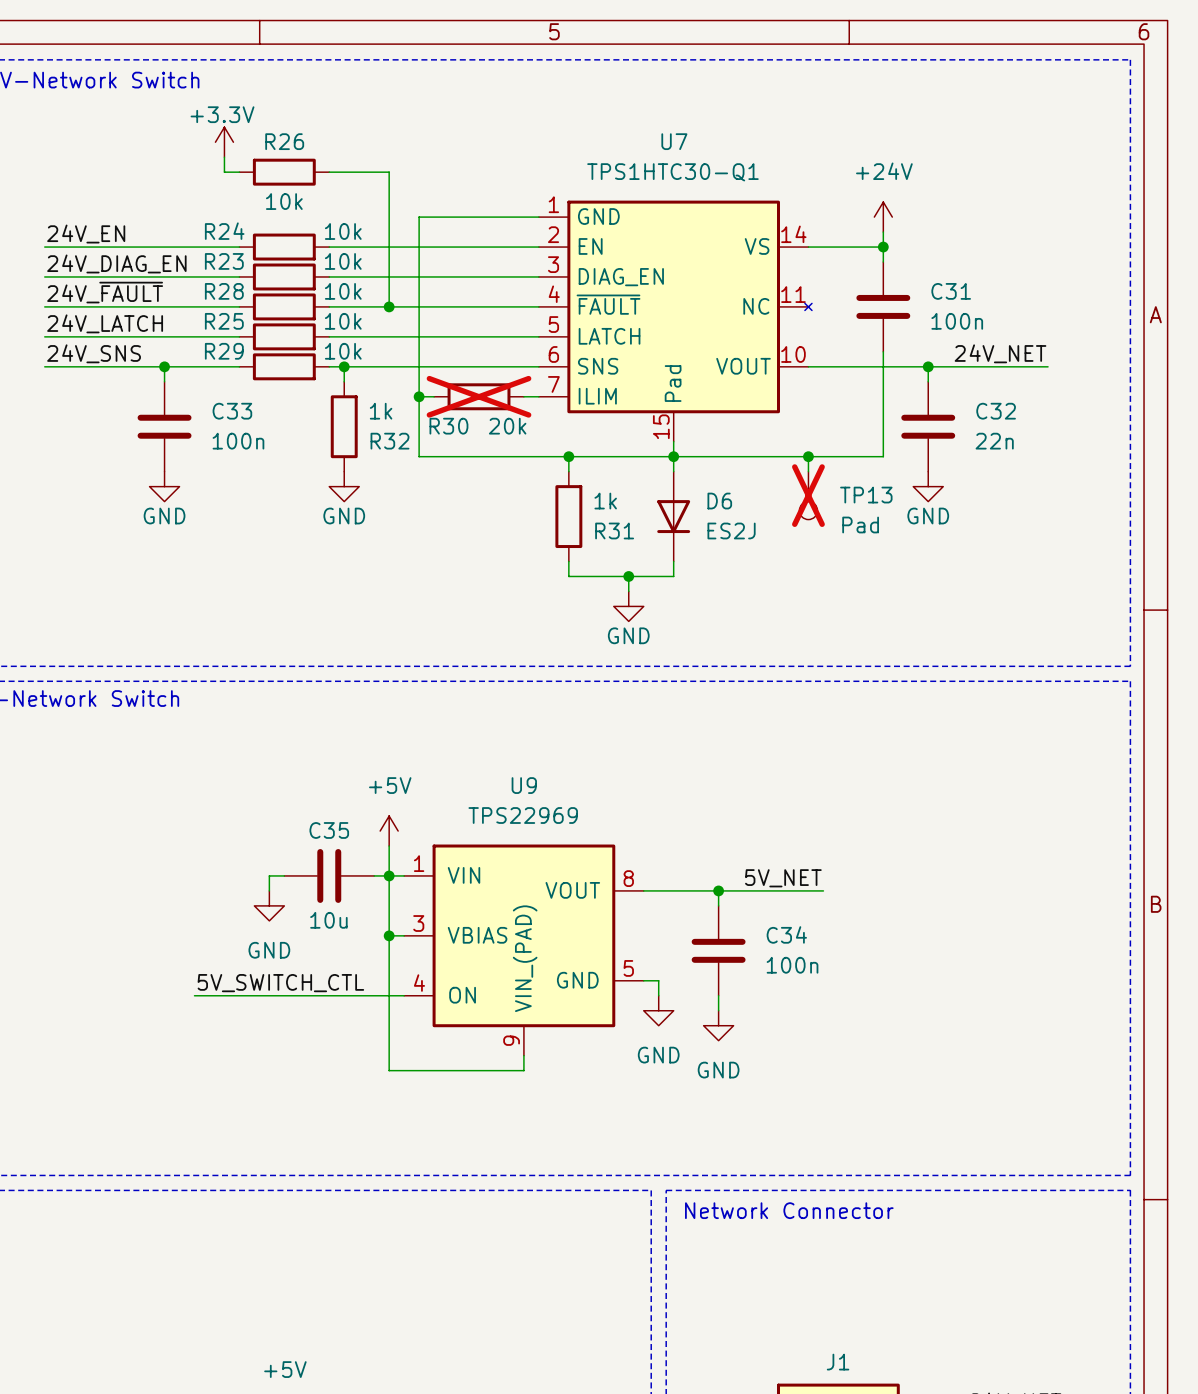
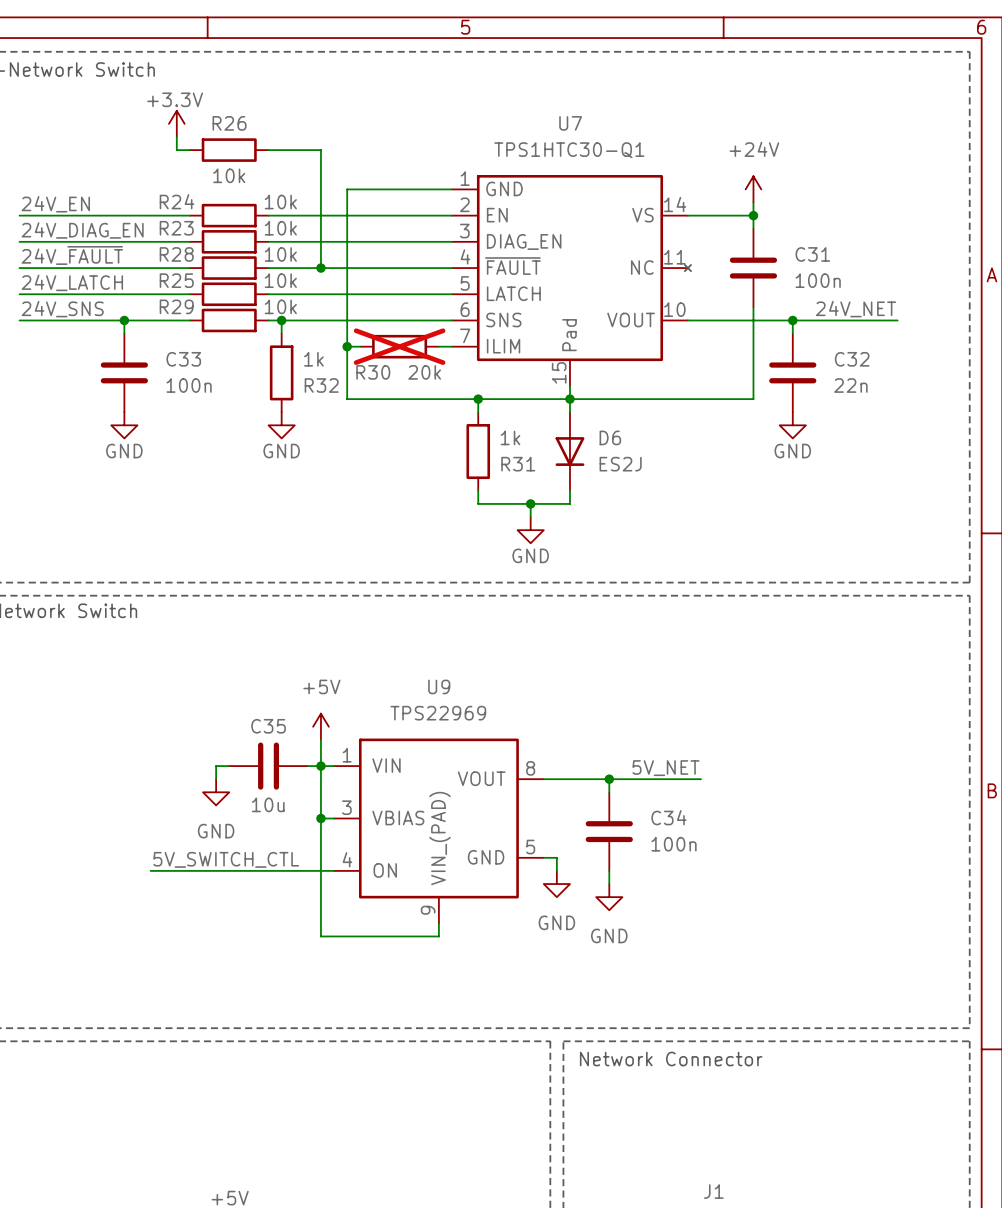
wire: (808, 456) (808, 471) -> none
junction: (808, 456) -> none
TP13: Pad (808, 495) -> none

